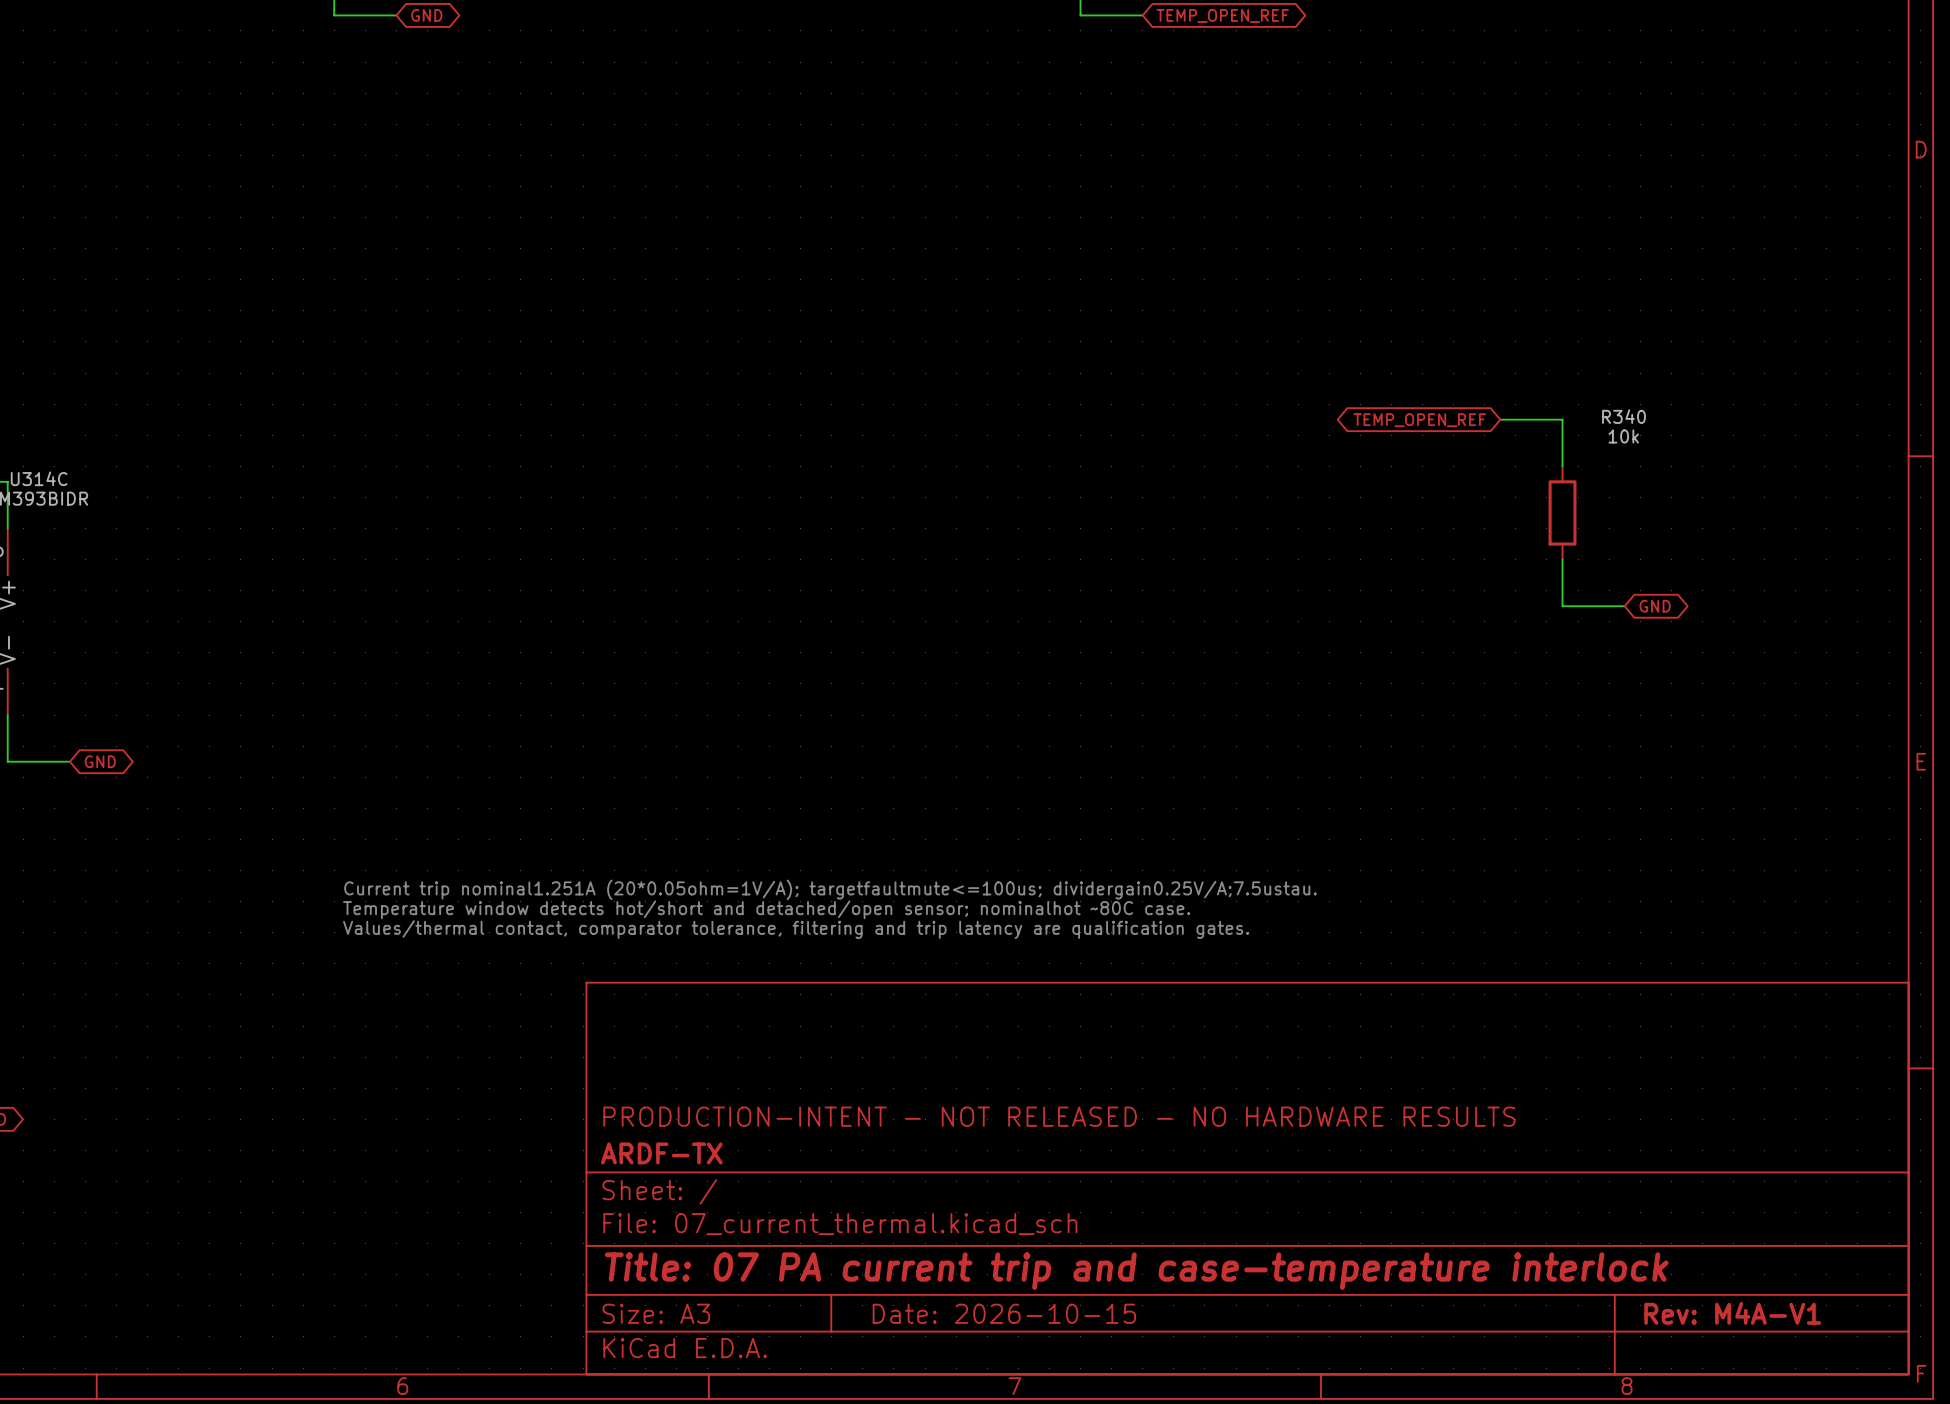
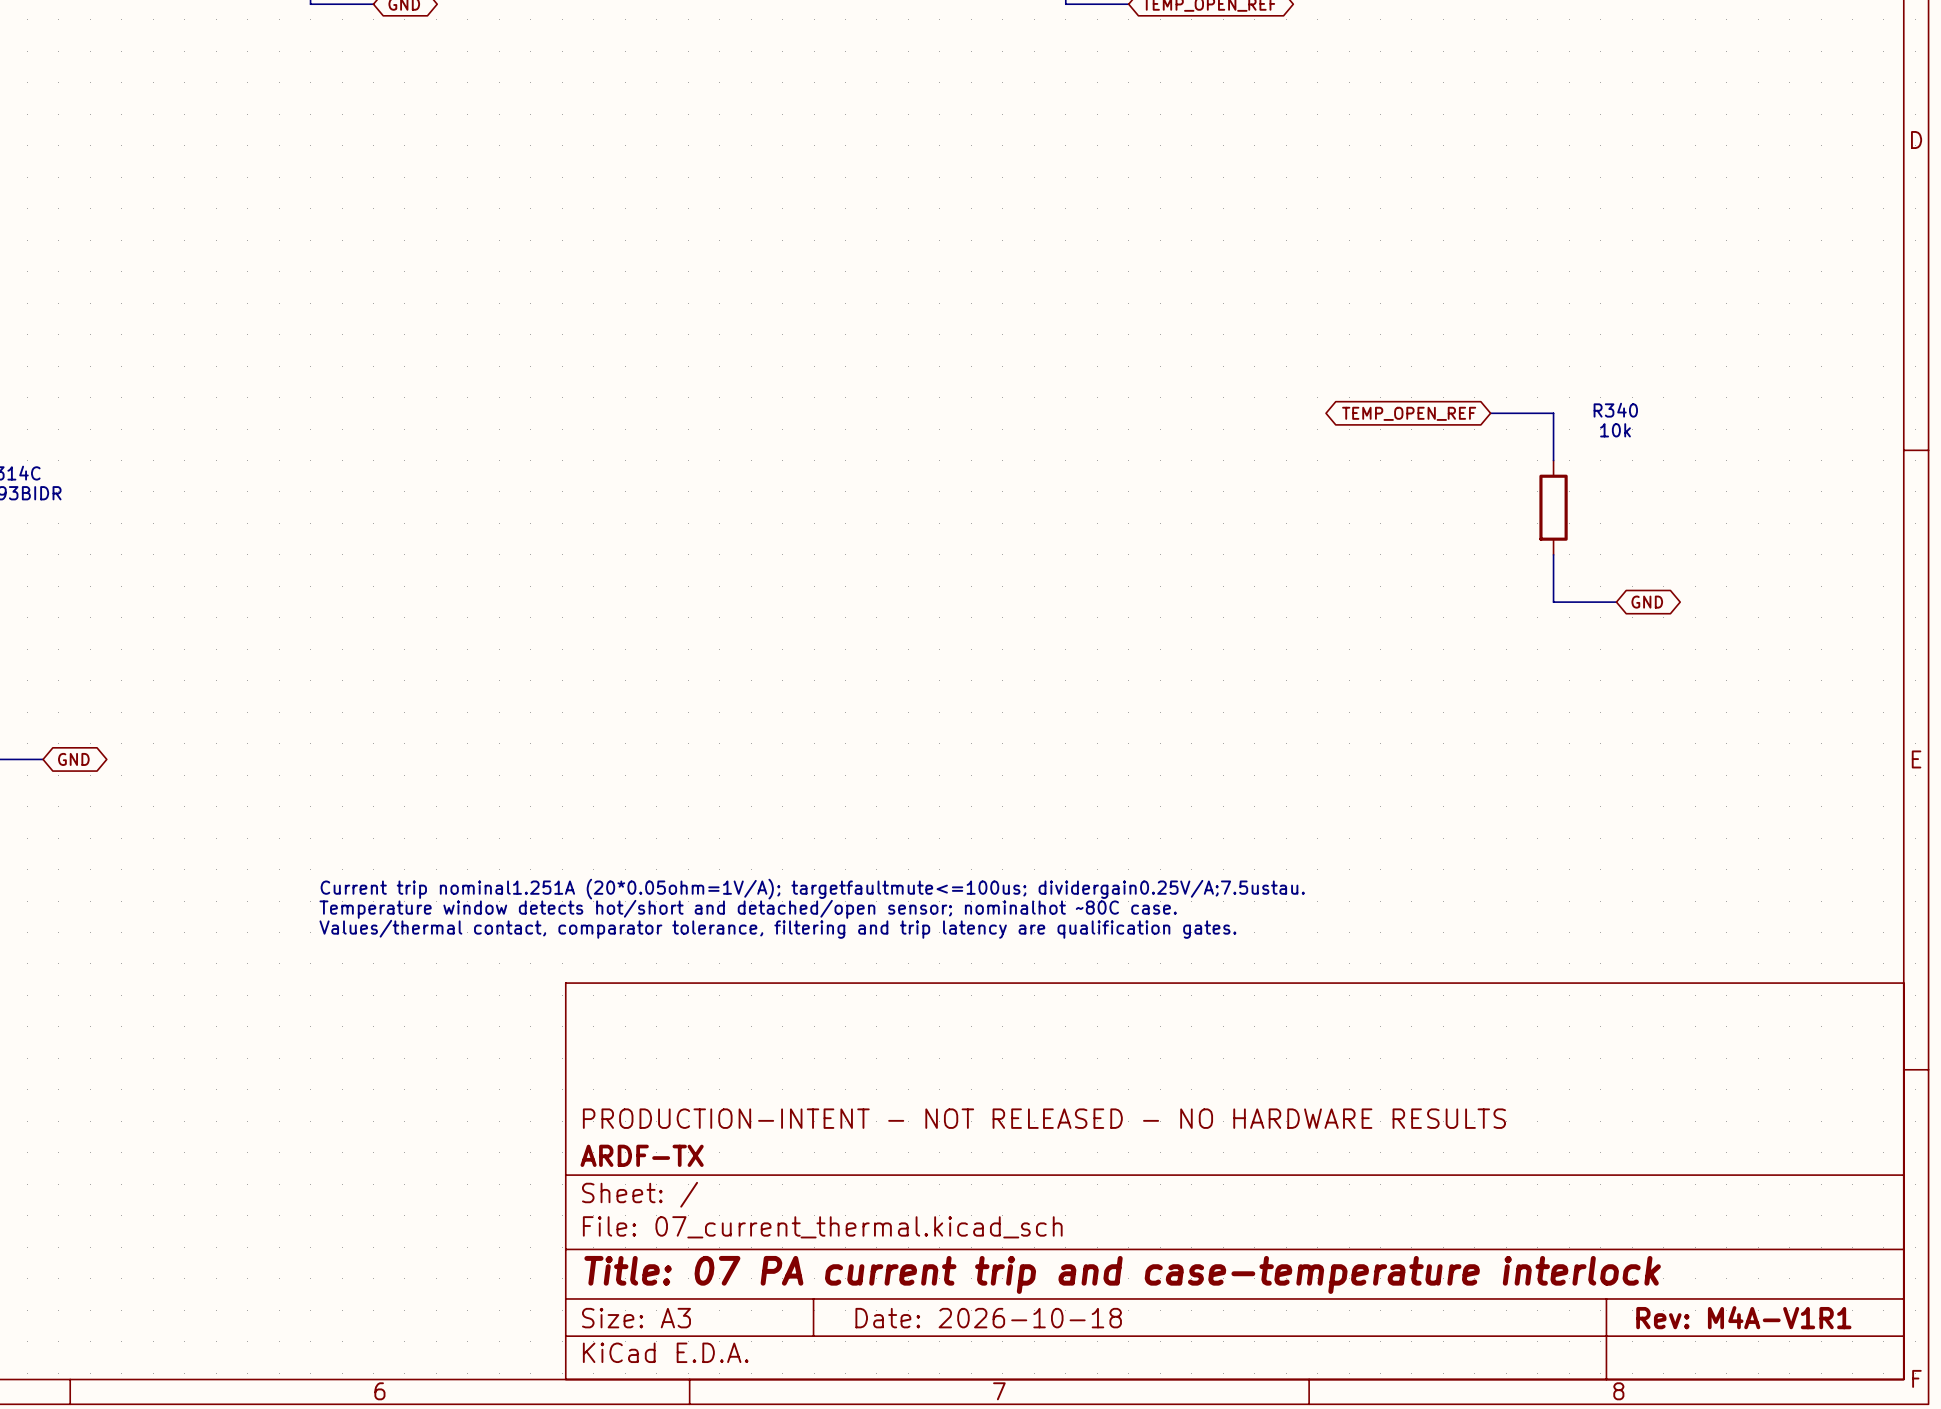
title block: Date: 2026-10-15 (1004, 1313) -> Date: 2026-10-18 (988, 1318)
title block: Rev: M4A-V1 (1732, 1313) -> Rev: M4A-V1R1 (1743, 1317)

